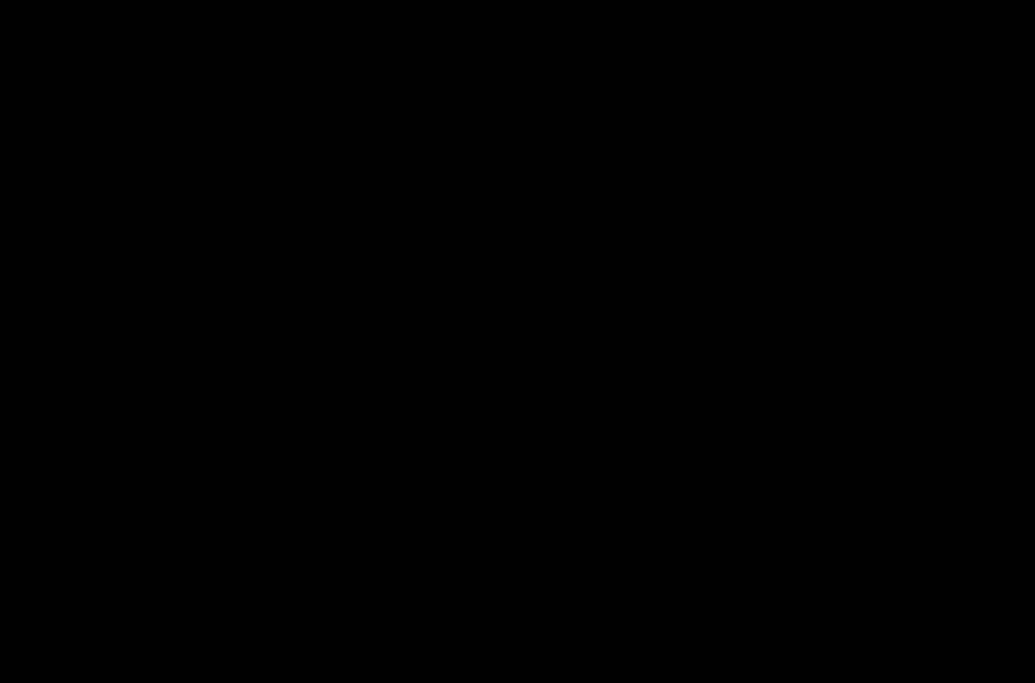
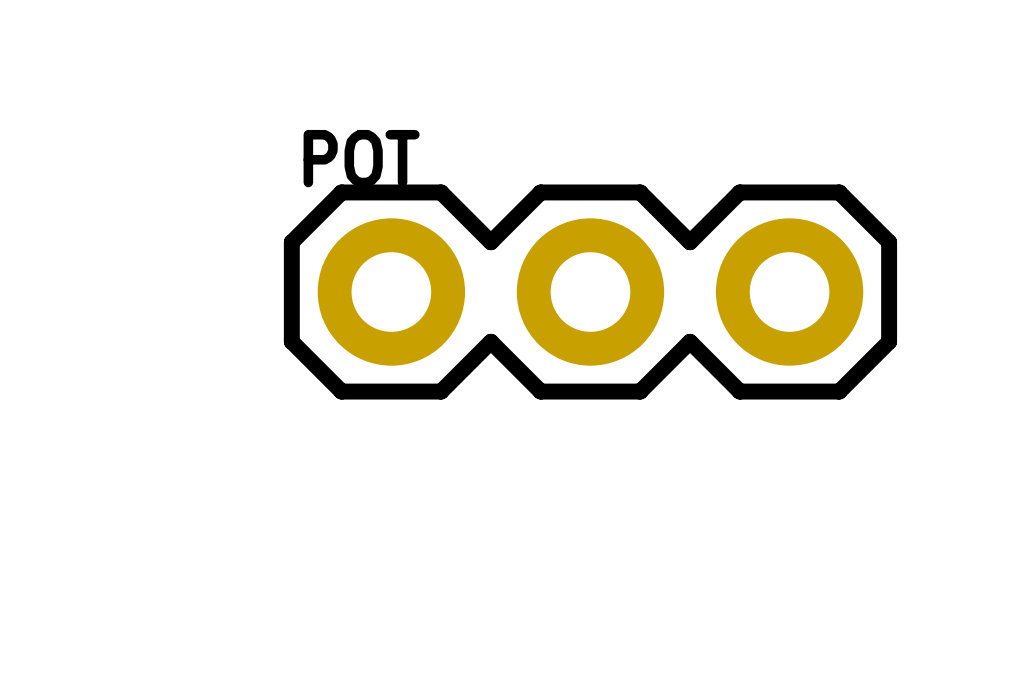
POT: none -> (590, 292)

